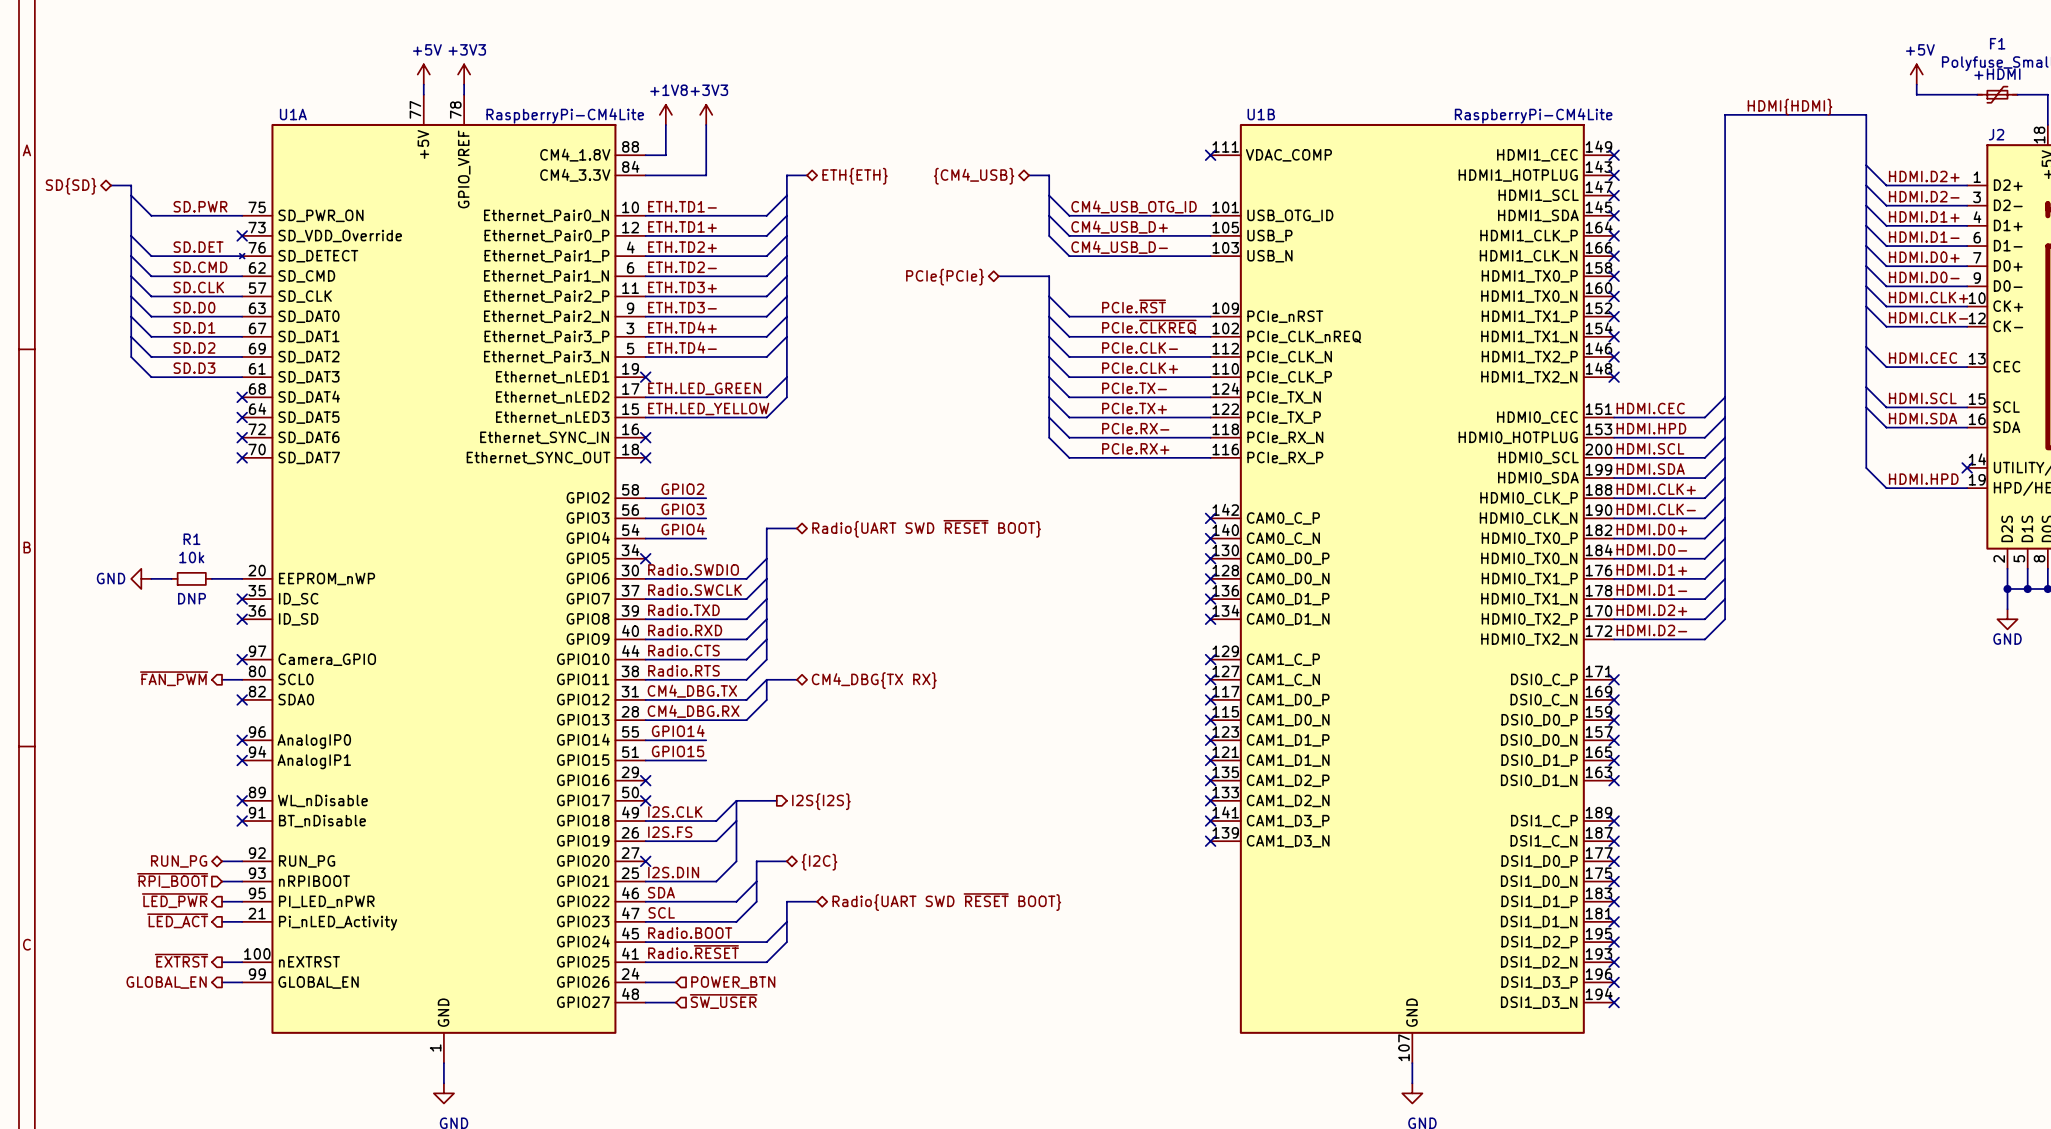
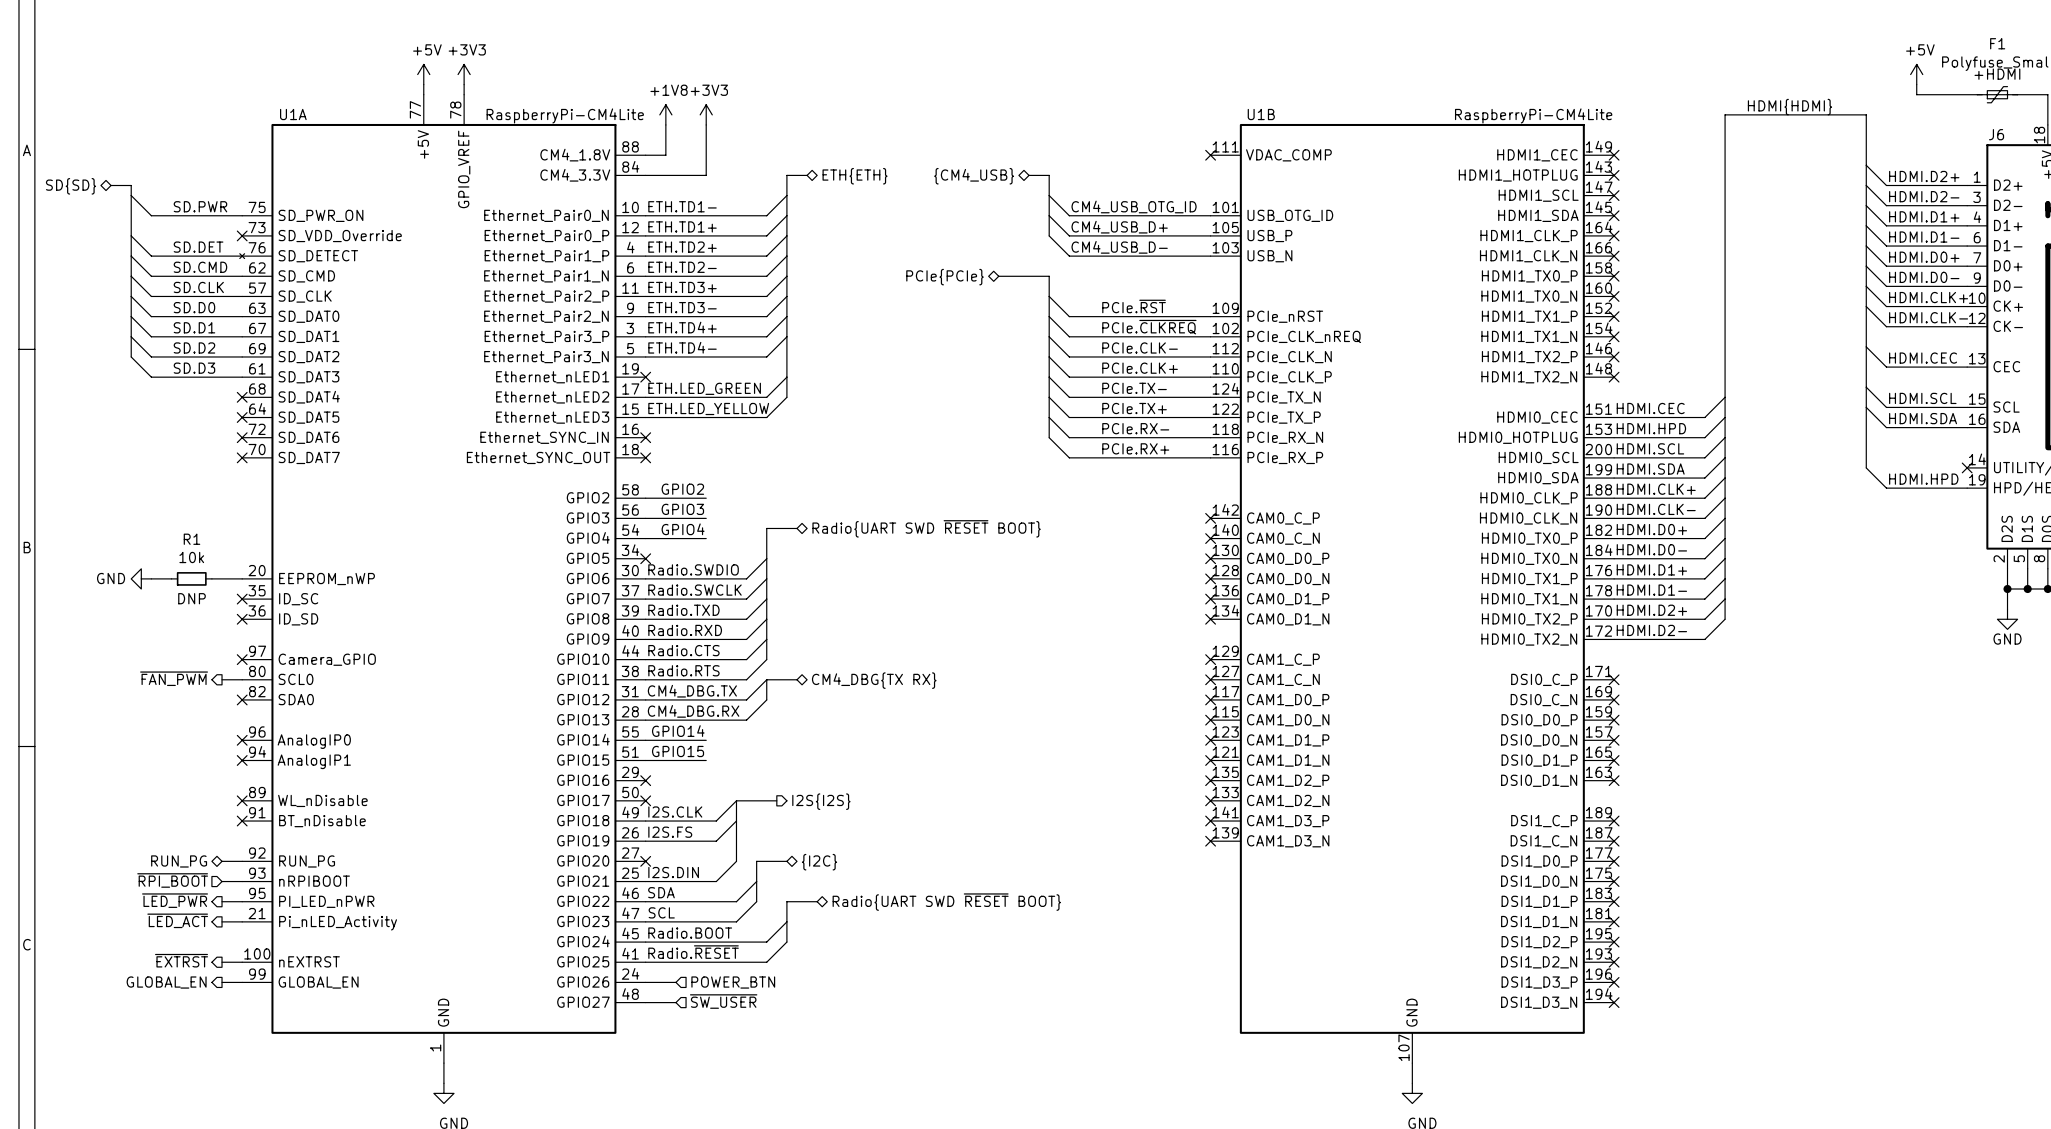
J2 name: J2 (1996, 134) -> J6 (1996, 134)

